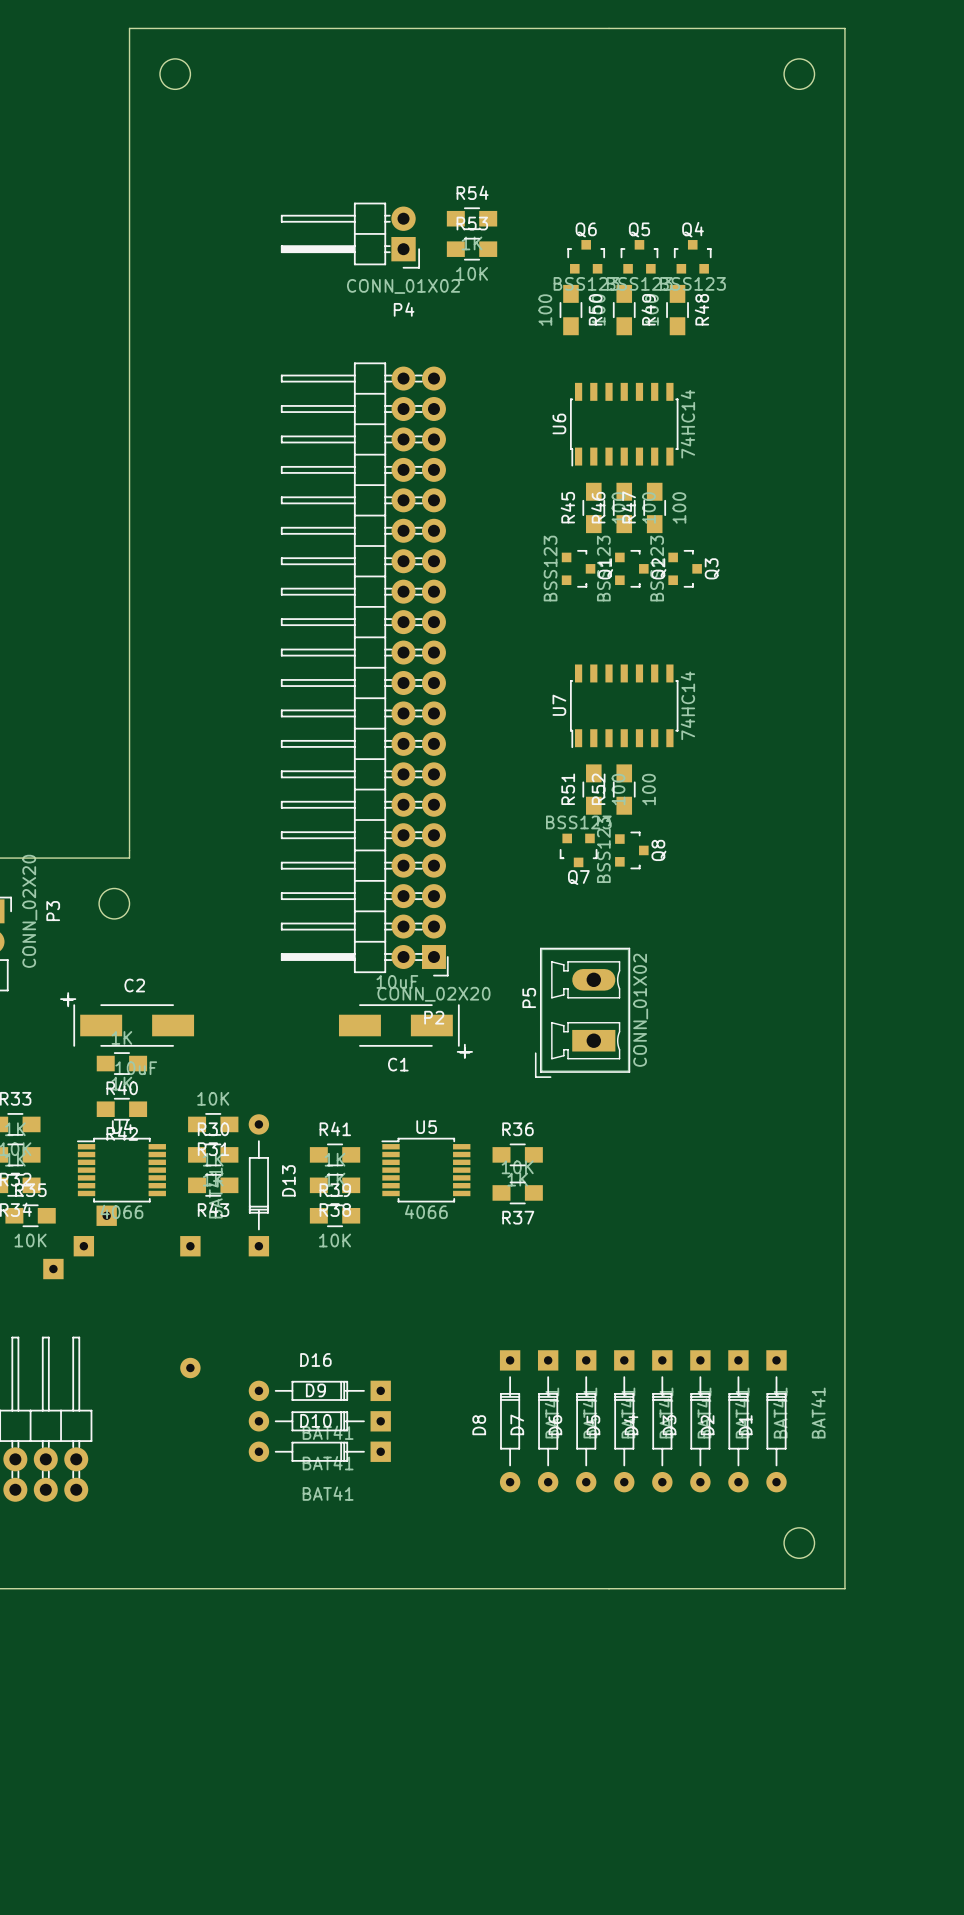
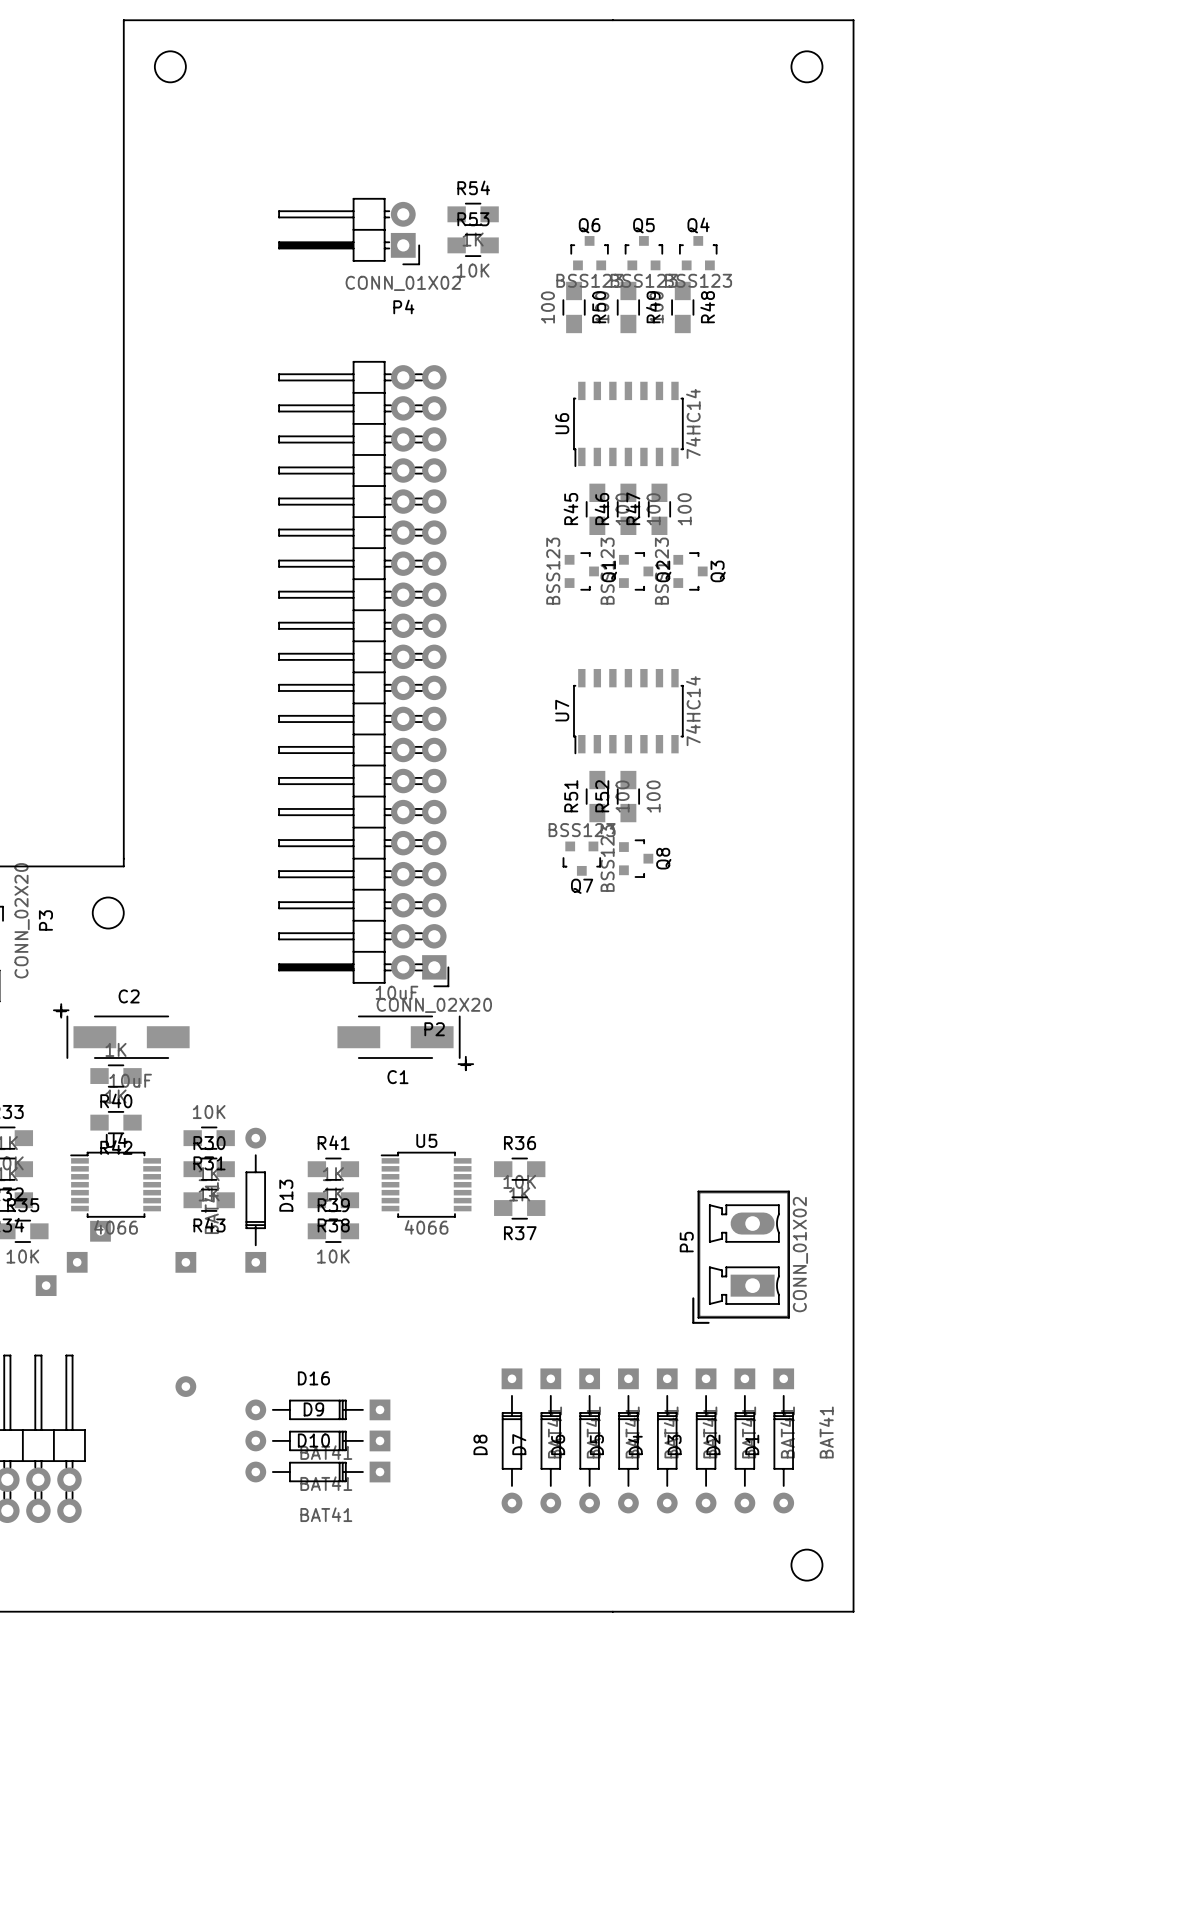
P5 position: (582, 1012) -> (741, 1257)

